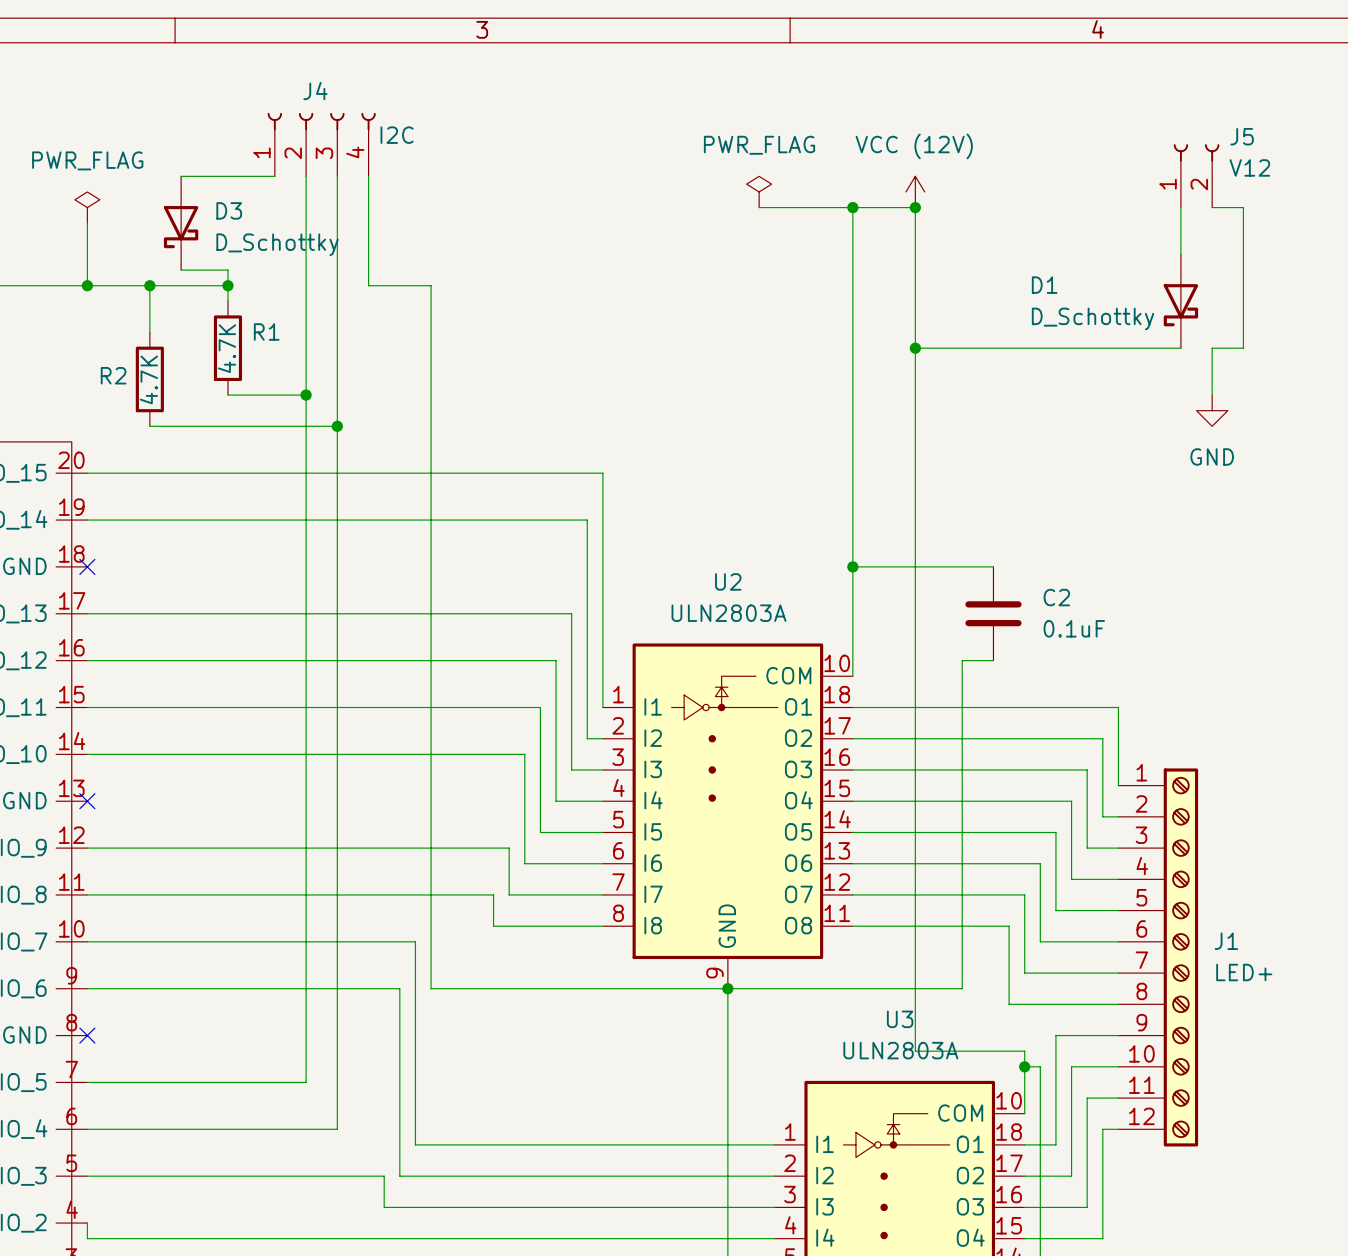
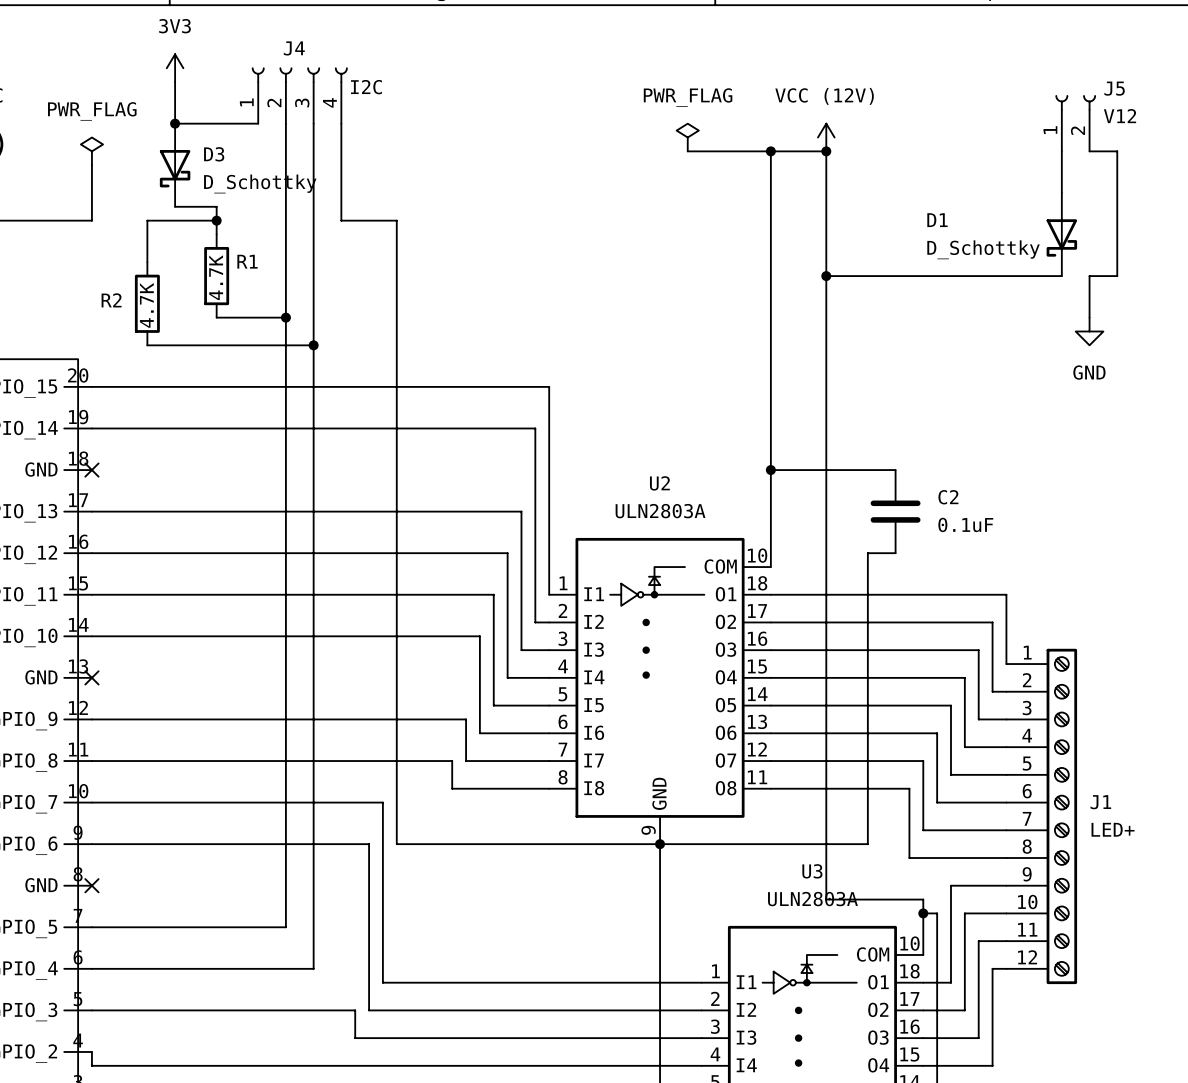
power symbol: none -> 3V3 (175, 68)
wire: none -> (175, 82) (175, 123)
junction: none -> (175, 123)
wire: (87, 285) (149, 285) -> none
junction: (87, 285) -> none
junction: (149, 285) -> none

